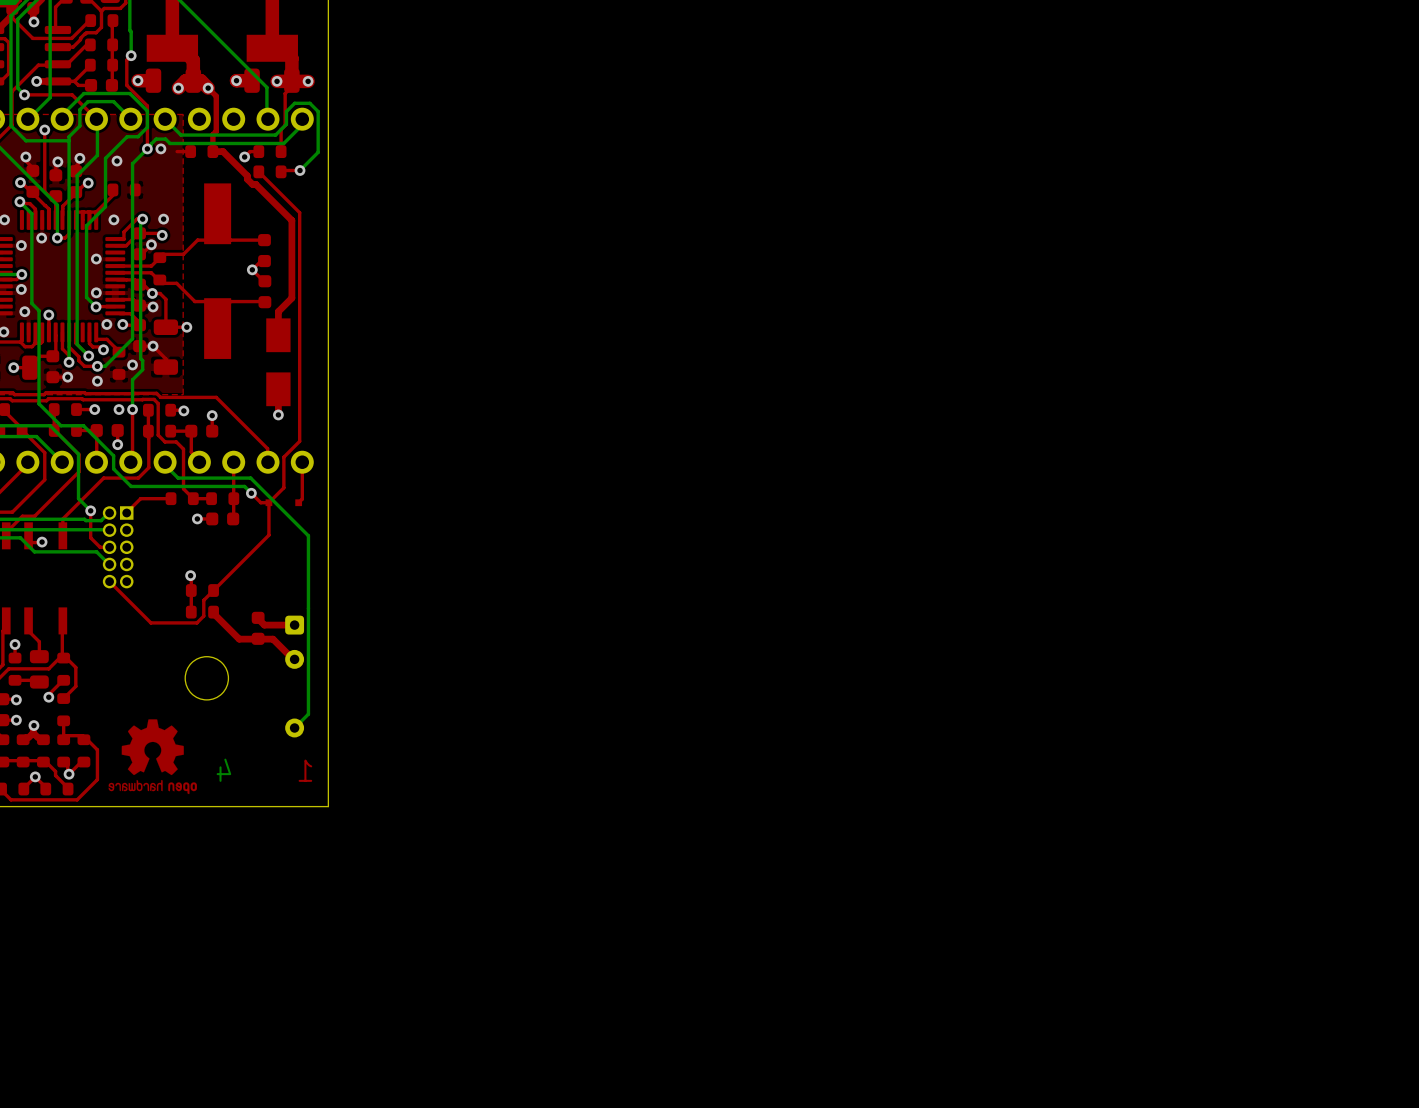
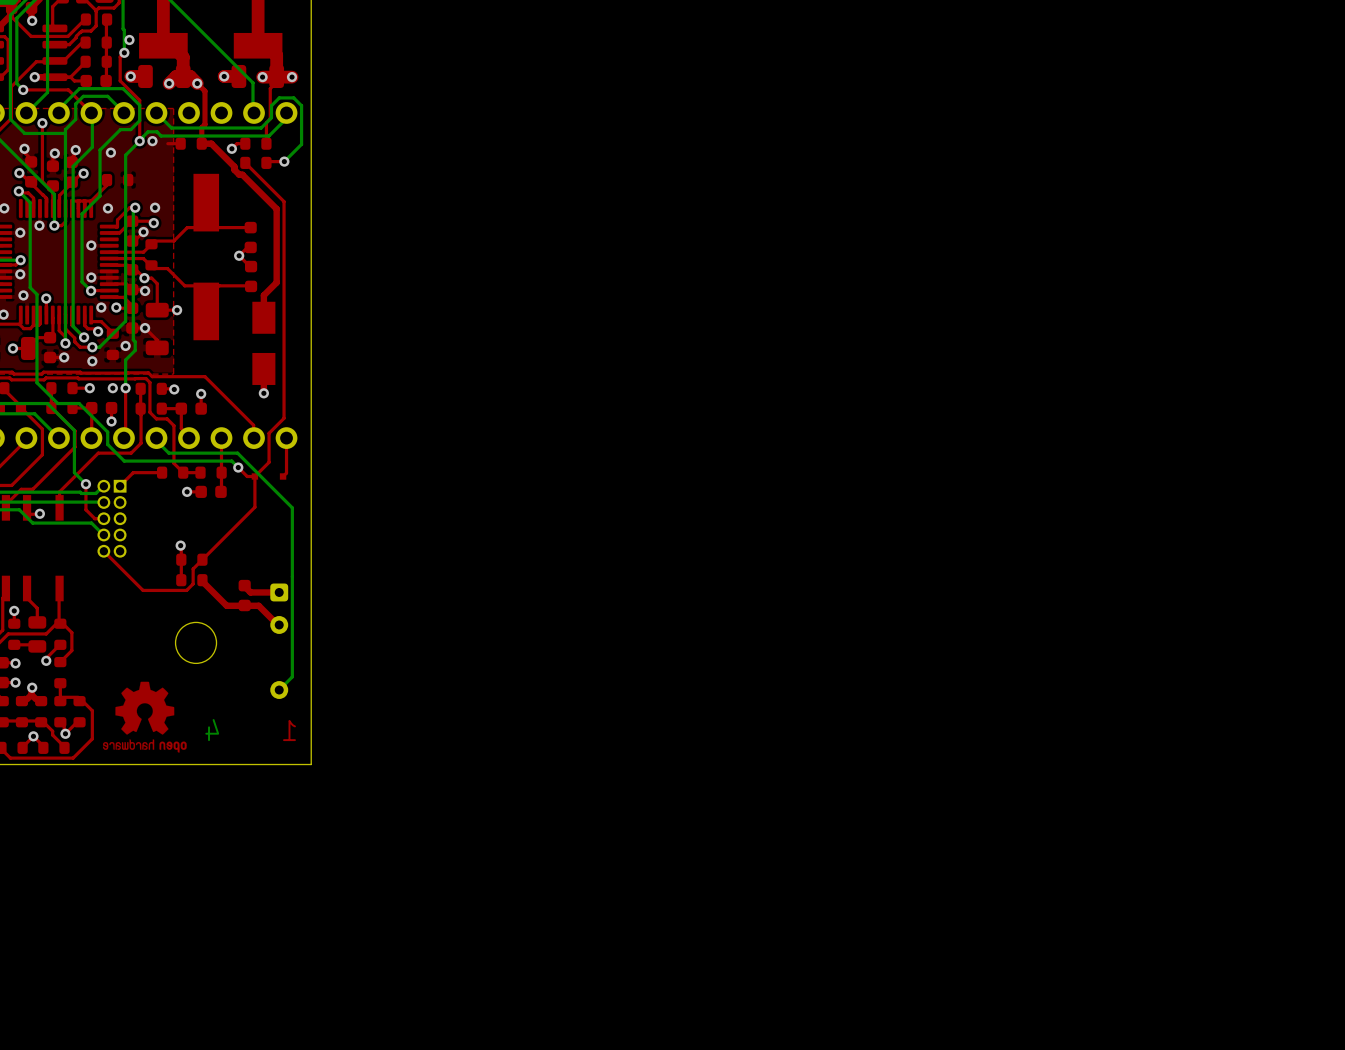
via: none -> (129, 40)

